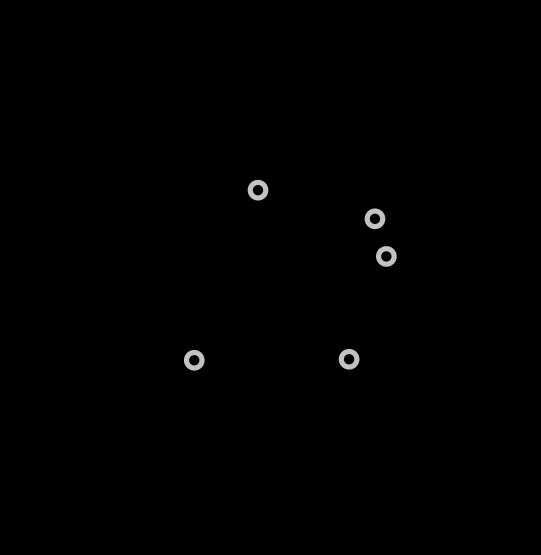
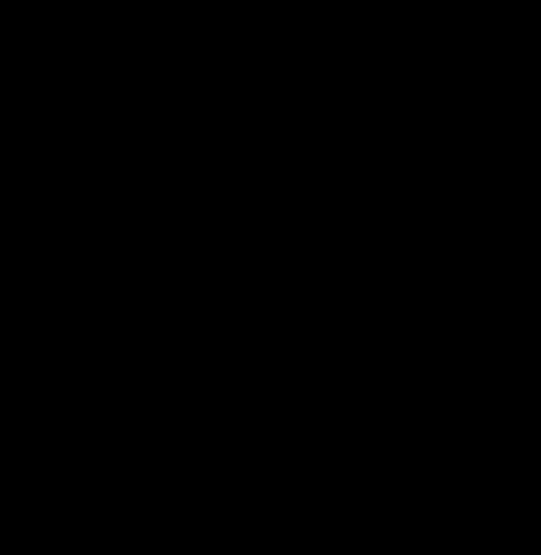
via: (258, 190) -> none
via: (374, 218) -> none
via: (386, 256) -> none
via: (349, 359) -> none
via: (194, 360) -> none

